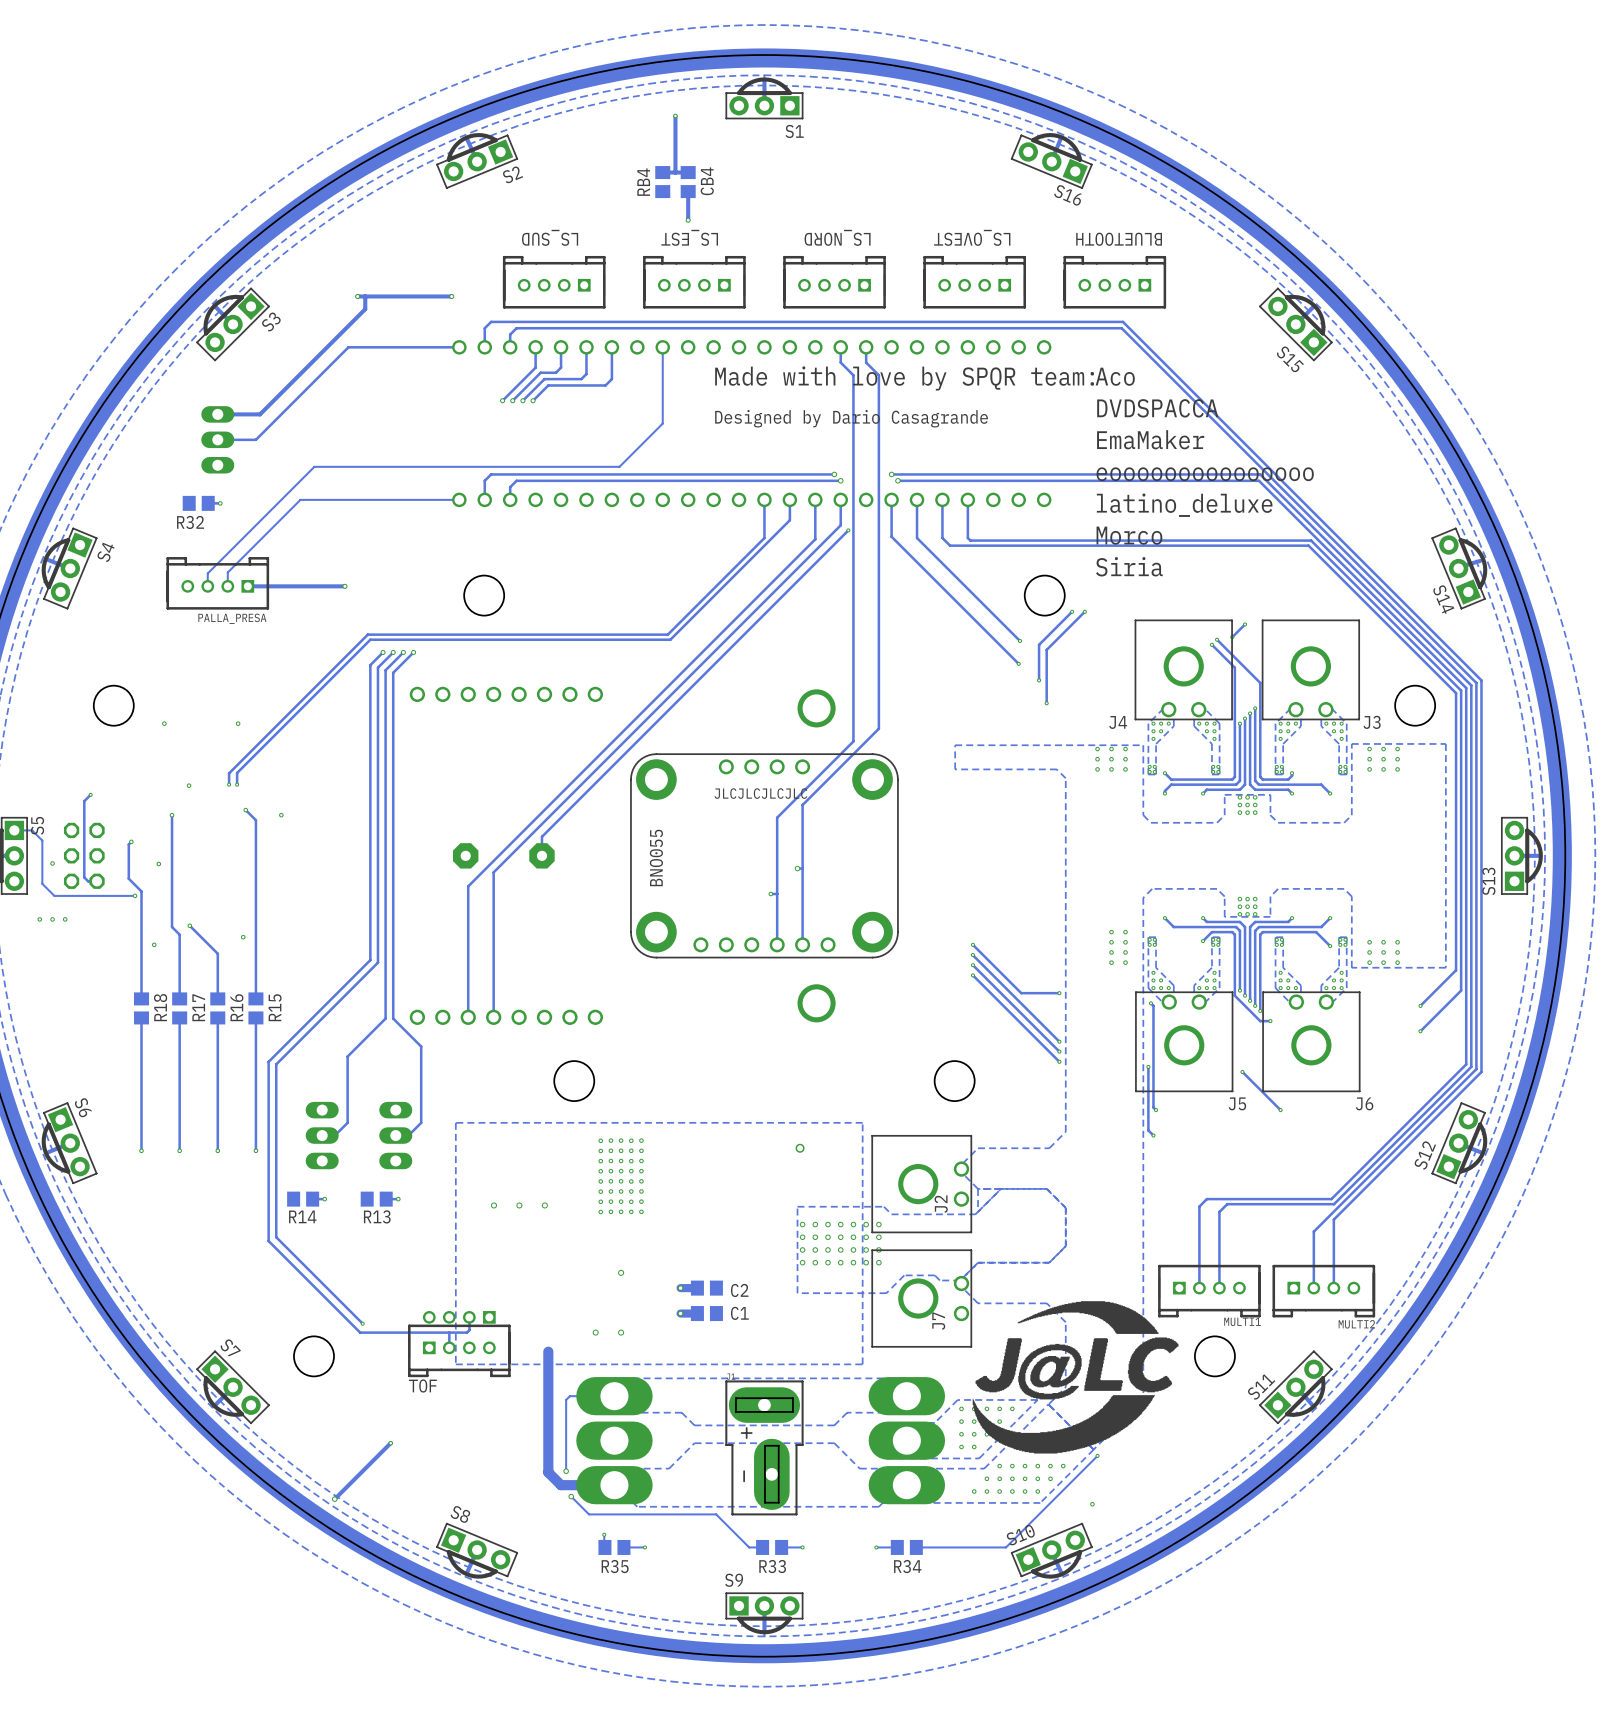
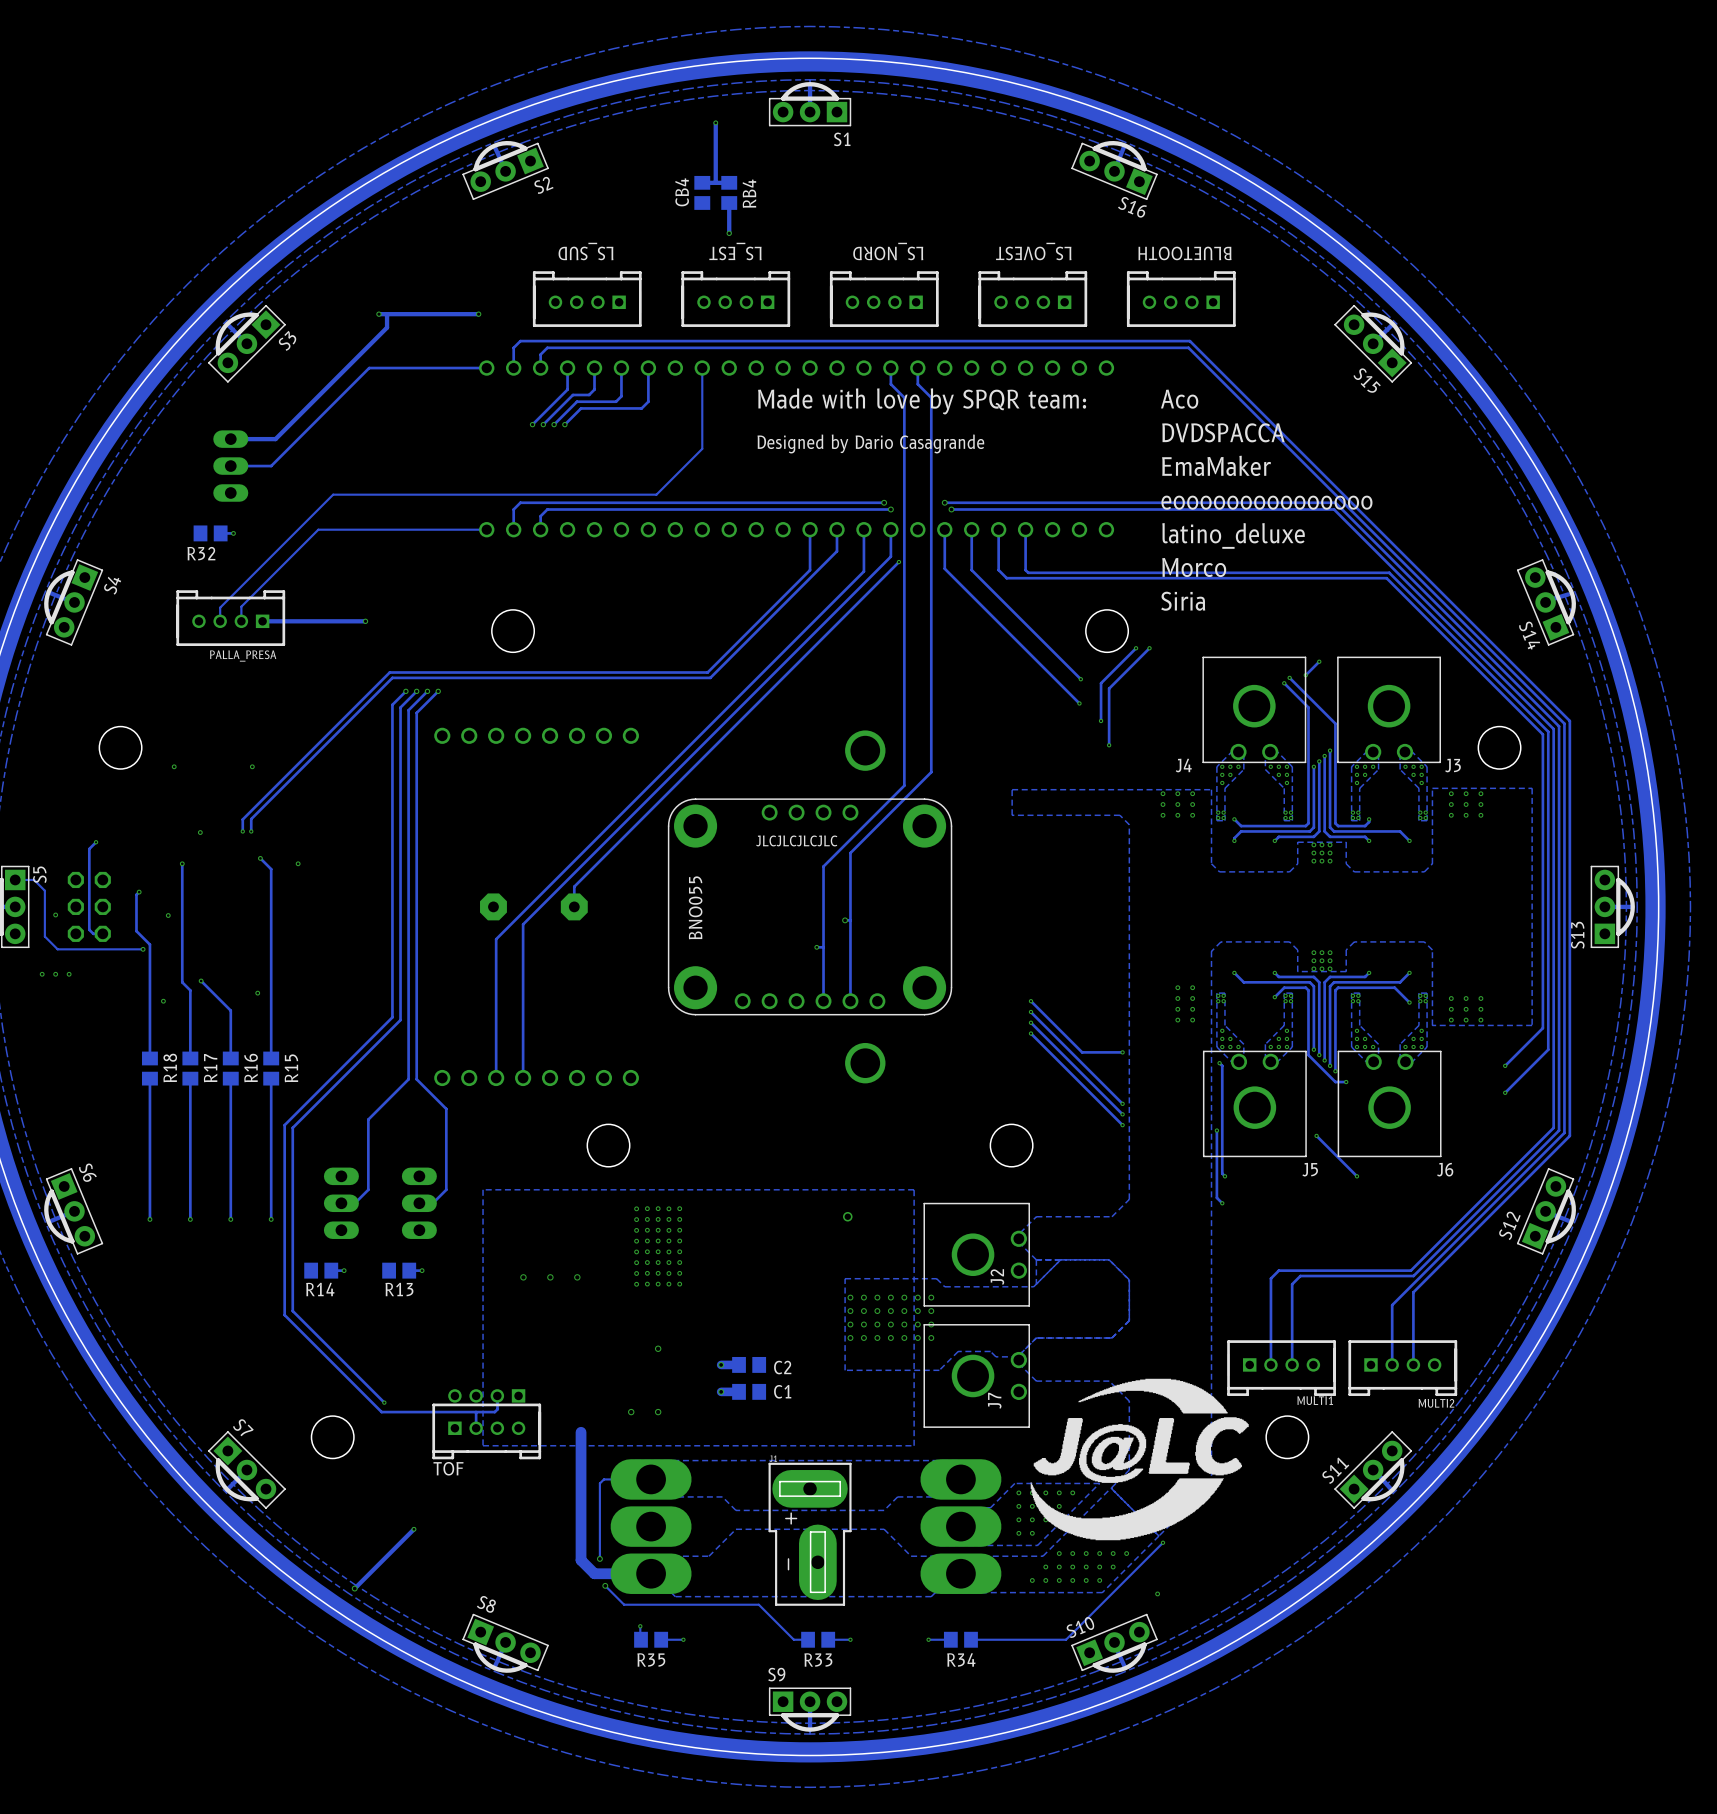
CB4 name position: CB4 (707, 181) -> CB4 (682, 192)
RB4 name position: RB4 (643, 182) -> RB4 (749, 193)

